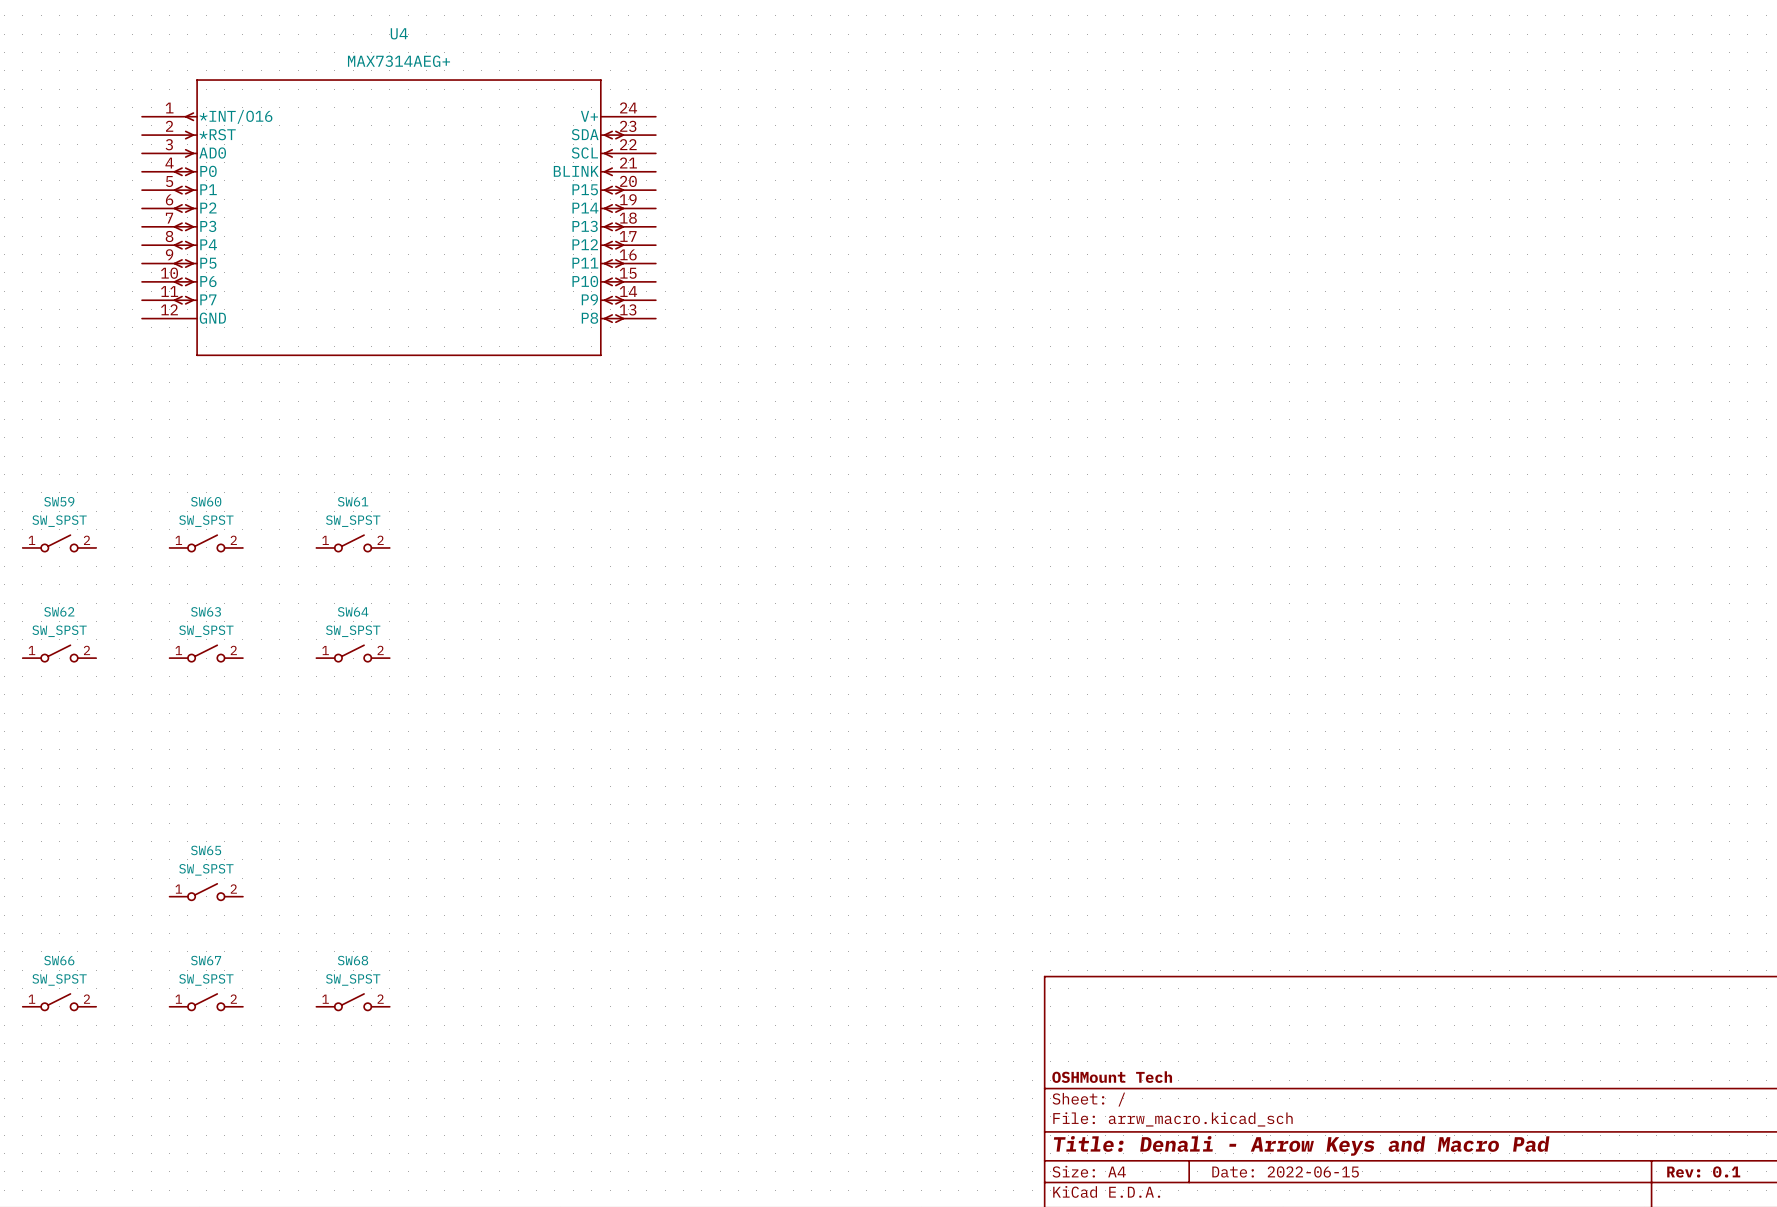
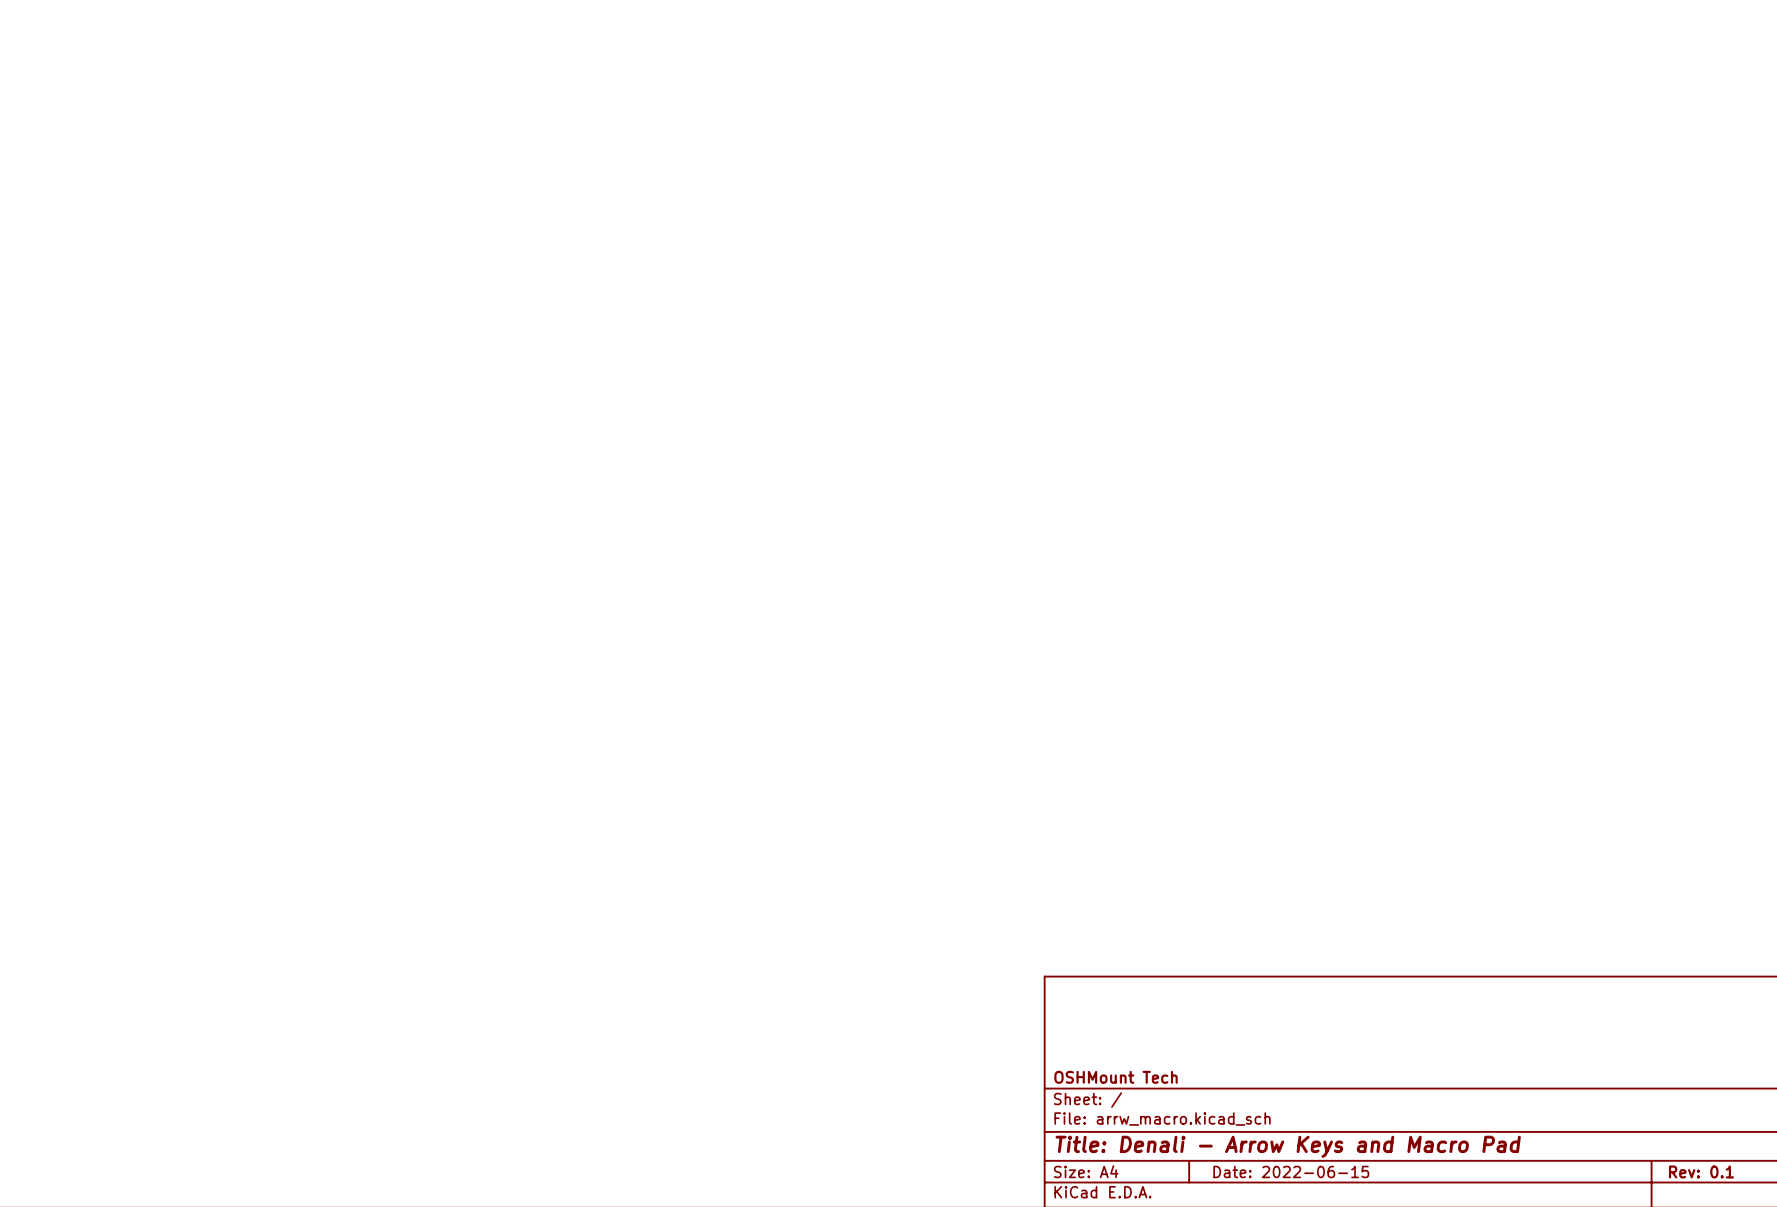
U4: MAX7314AEG+ (398, 217) -> none
SW59: SW_SPST (59, 543) -> none
SW60: SW_SPST (206, 543) -> none
SW61: SW_SPST (353, 543) -> none
SW62: SW_SPST (59, 653) -> none
SW63: SW_SPST (206, 653) -> none
SW64: SW_SPST (353, 653) -> none
SW65: SW_SPST (206, 892) -> none
SW66: SW_SPST (59, 1002) -> none
SW67: SW_SPST (206, 1002) -> none
SW68: SW_SPST (353, 1002) -> none

